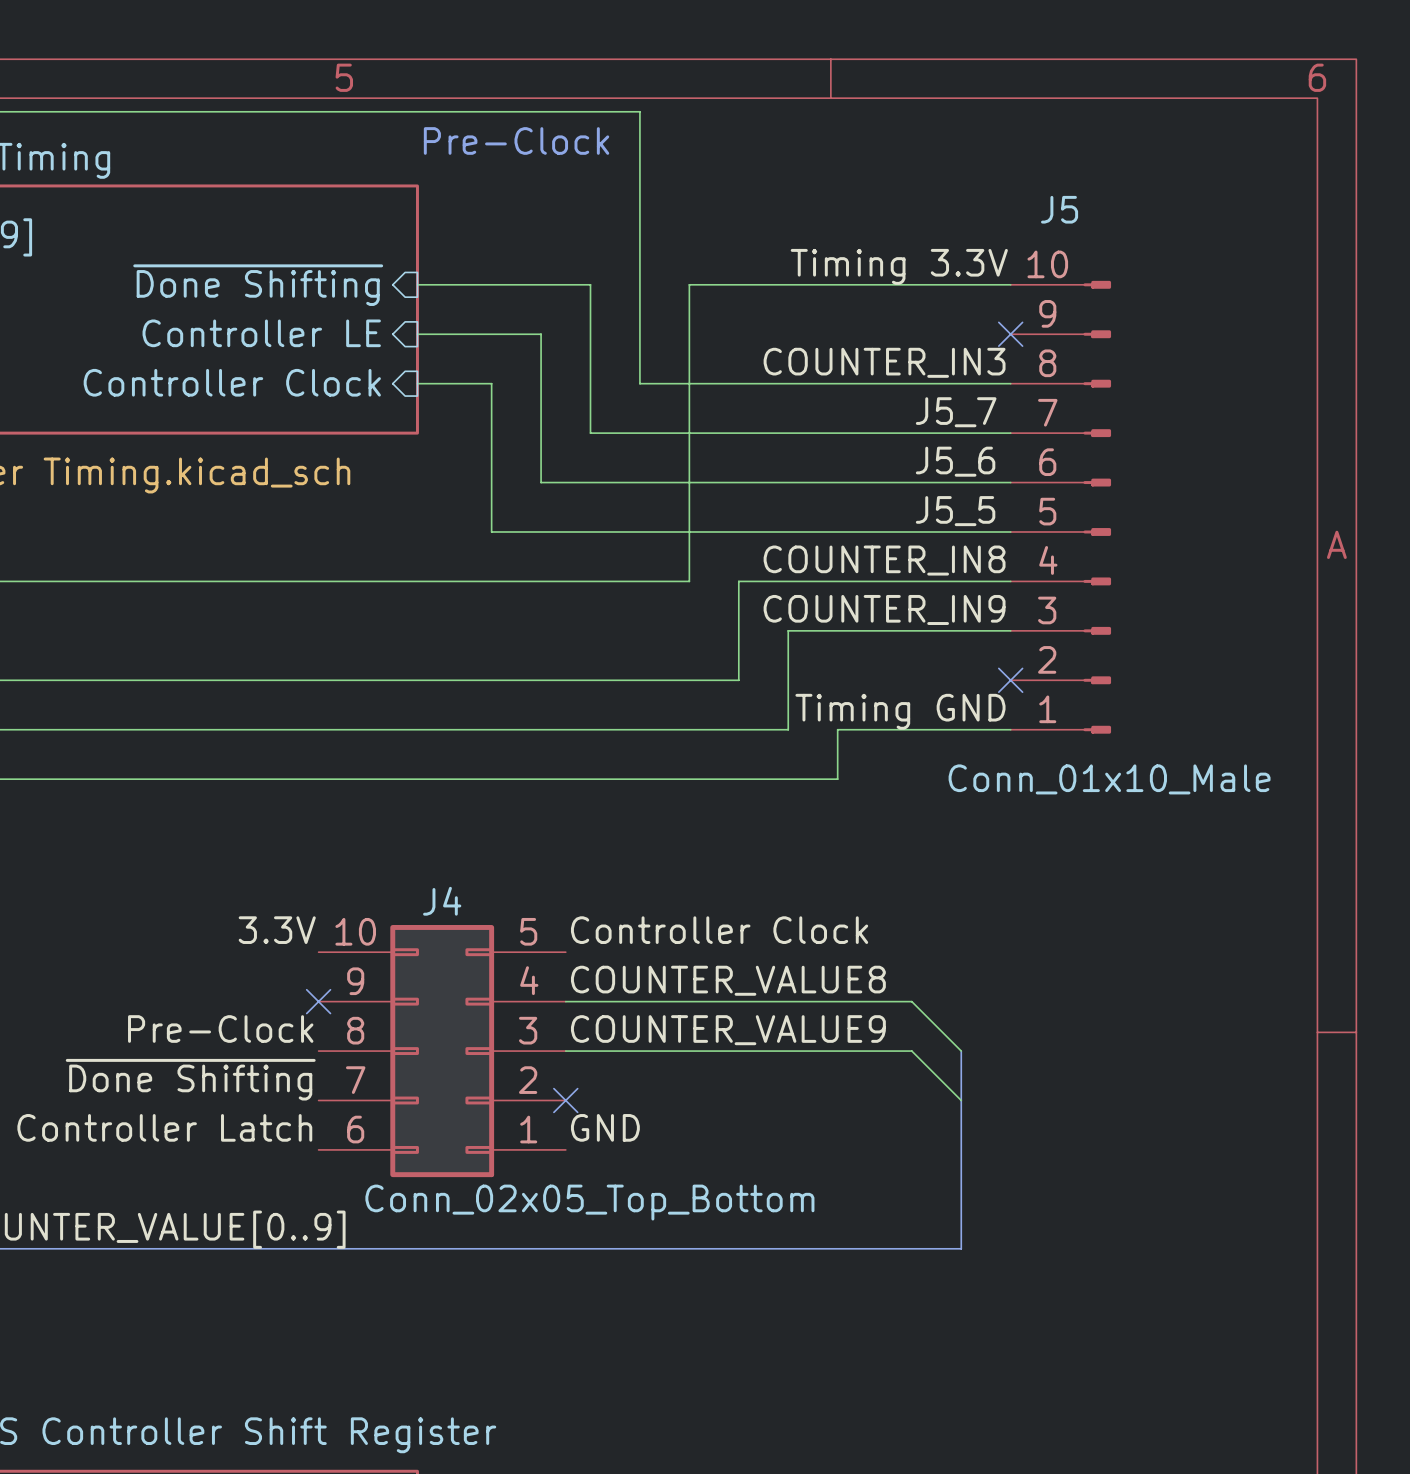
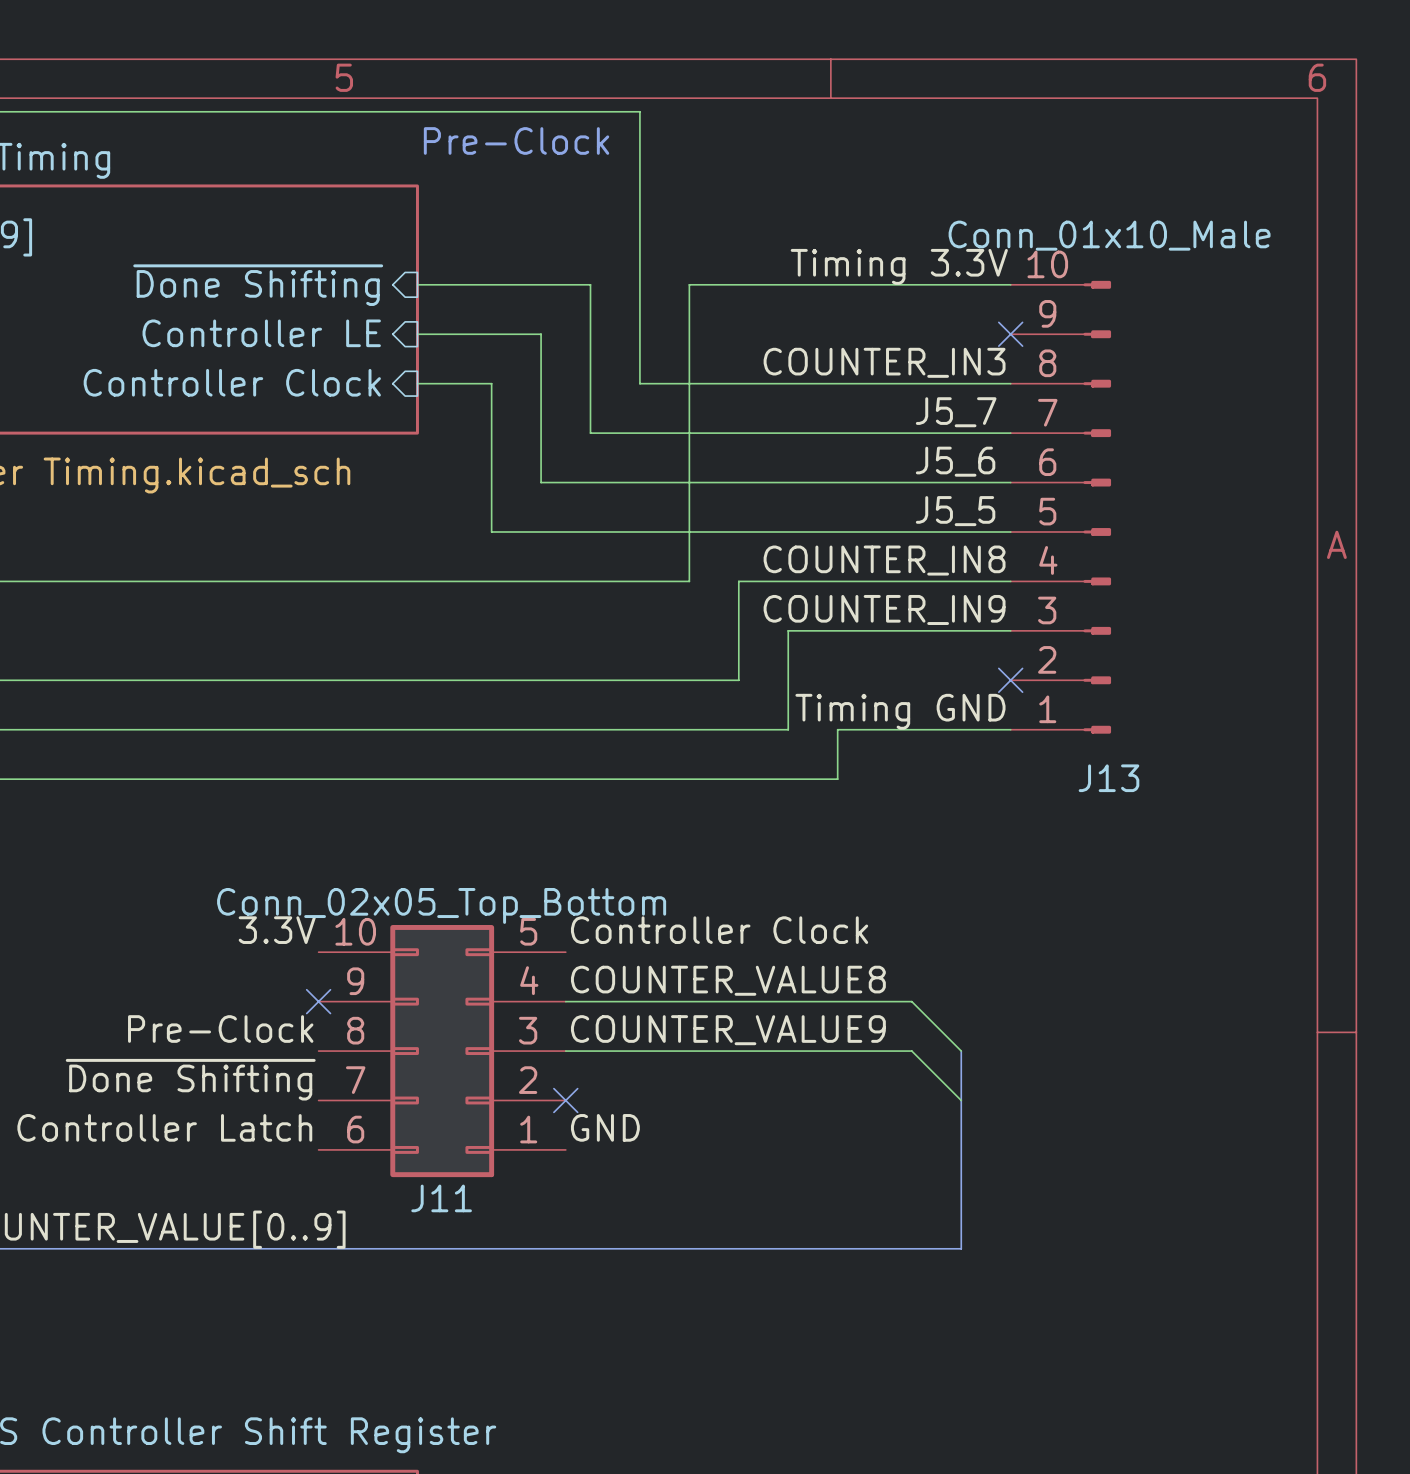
J5 name: J5 (1059, 209) -> J13 (1108, 778)
J5 value position: Conn_01x10_Male (1109, 779) -> Conn_01x10_Male (1109, 235)
J4 name: J4 (442, 901) -> J11 (441, 1198)
J4 value position: Conn_02x05_Top_Bottom (589, 1202) -> Conn_02x05_Top_Bottom (441, 905)

